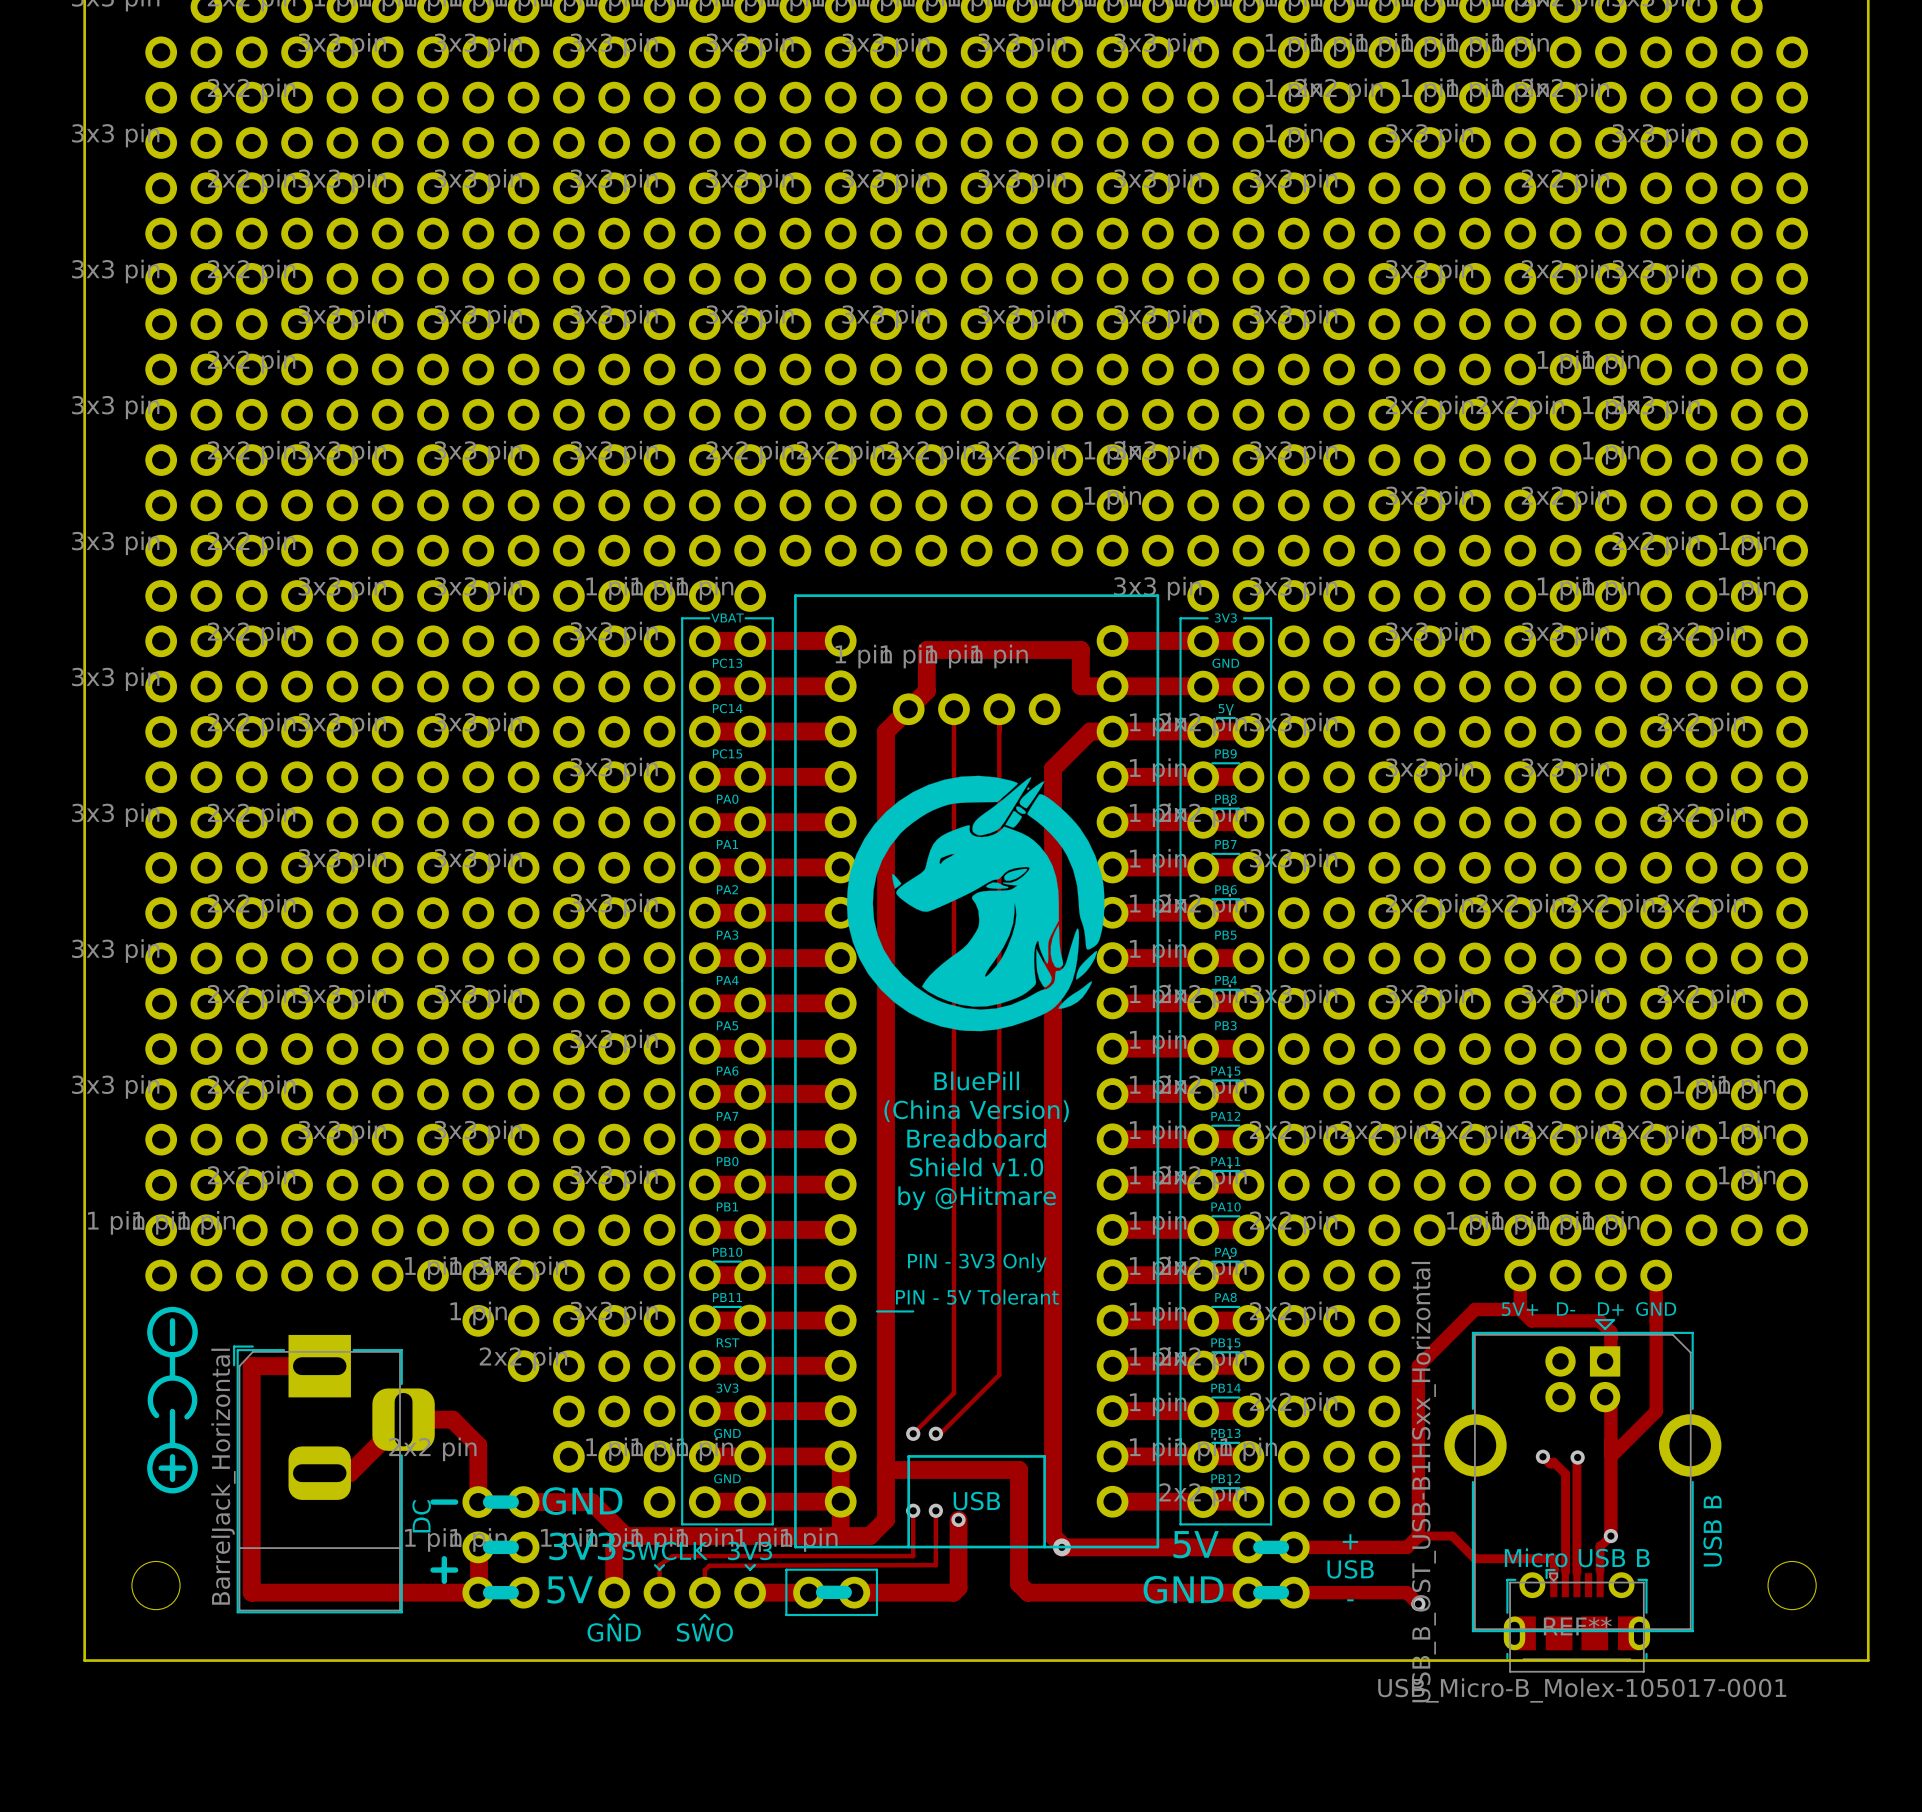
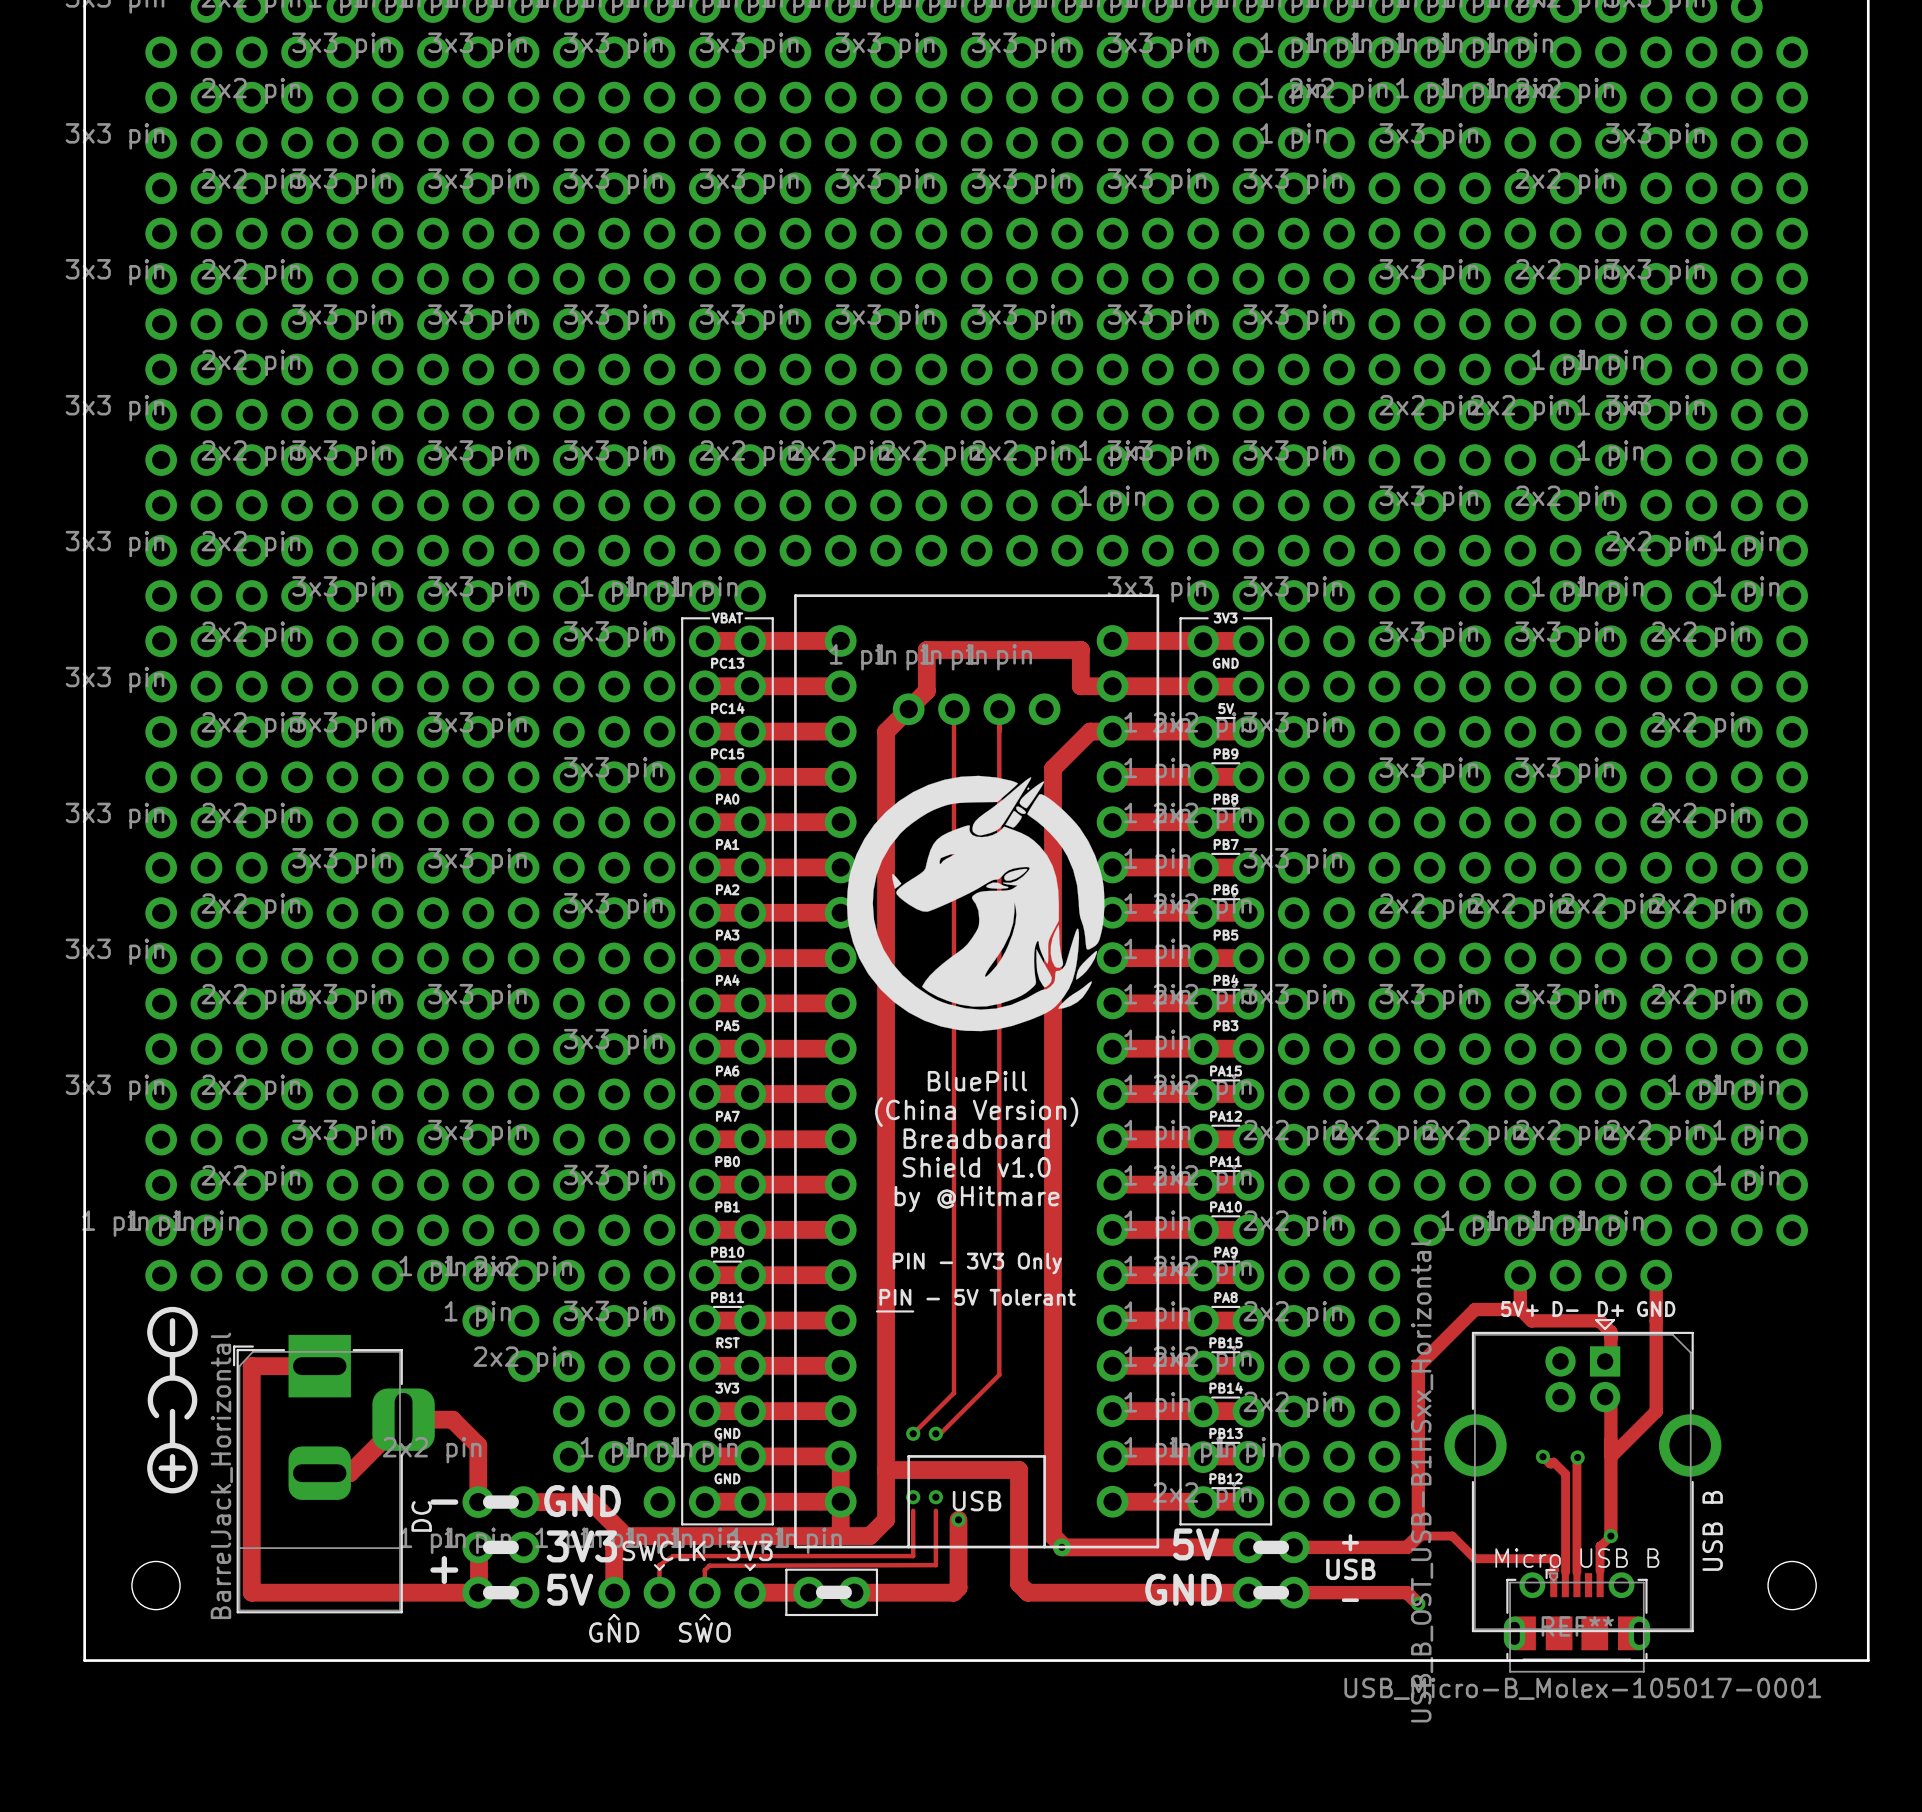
via position: (913, 1510) -> (913, 1497)
via position: (935, 1510) -> (935, 1497)

